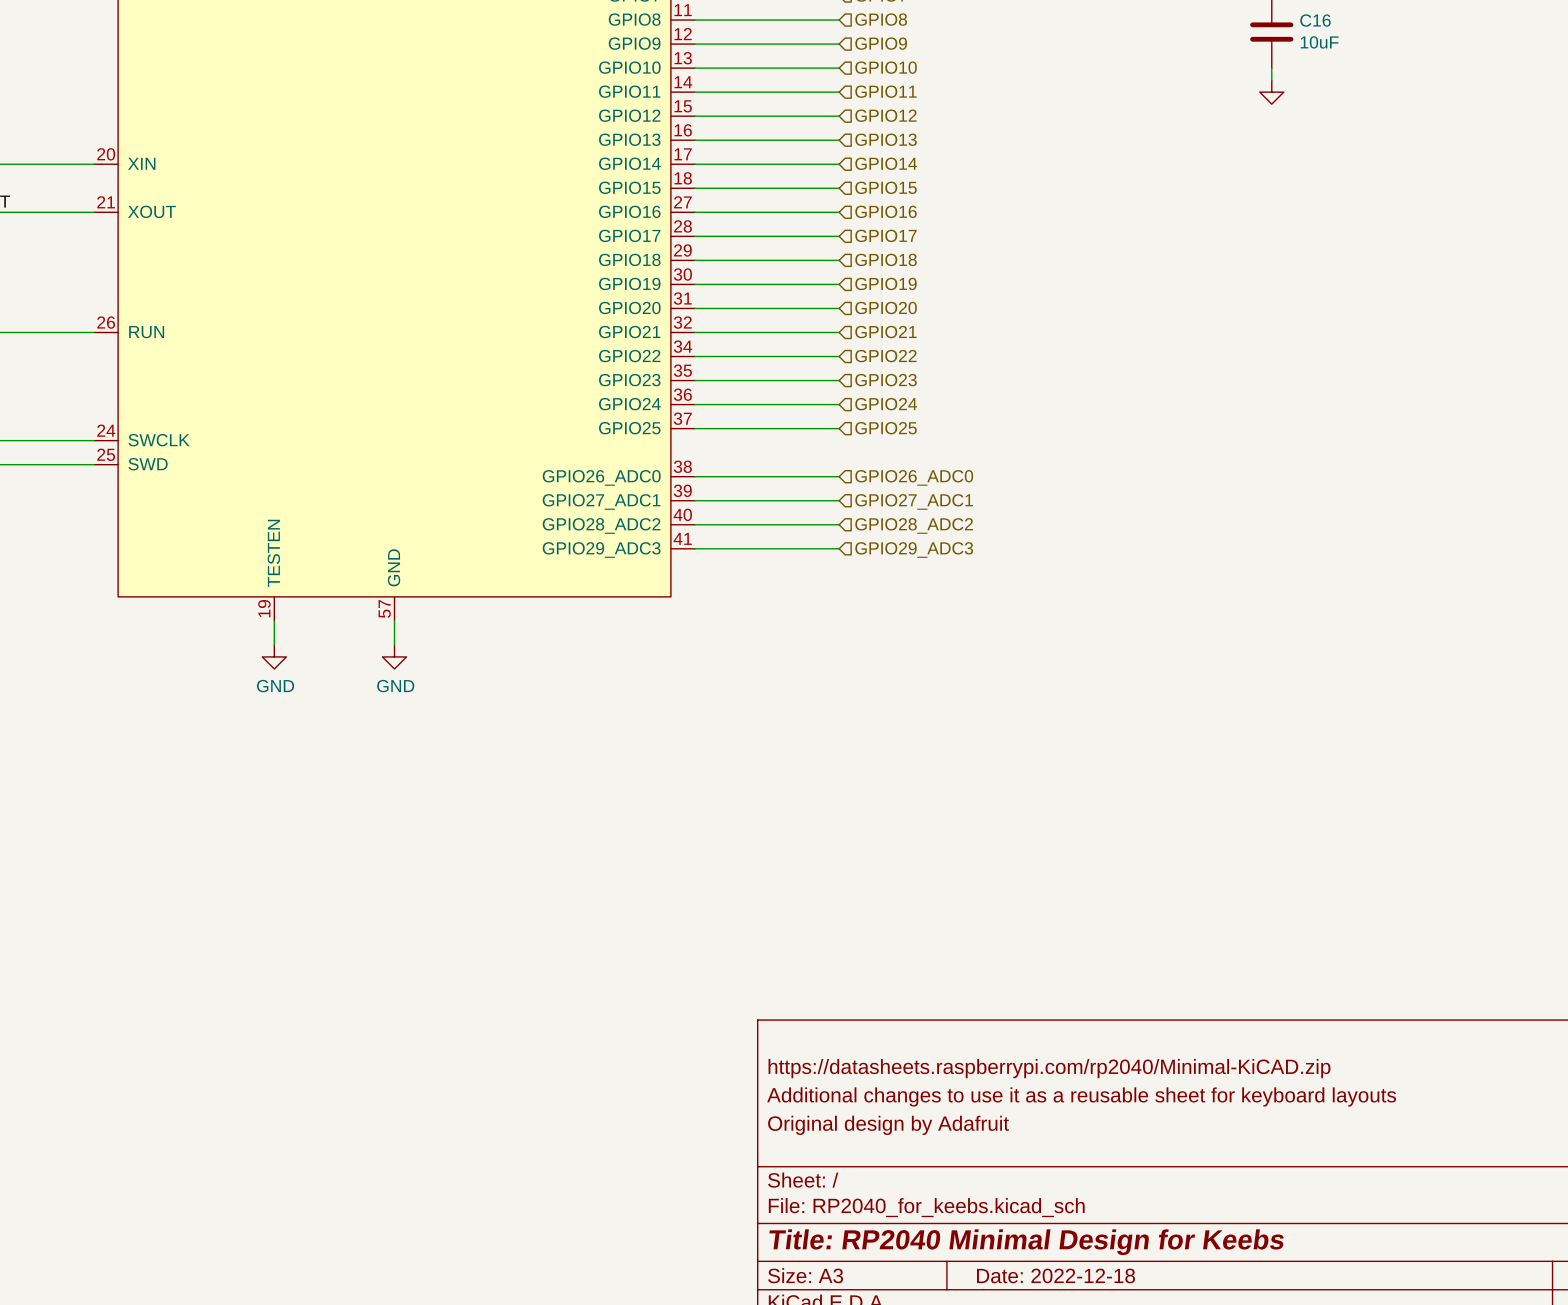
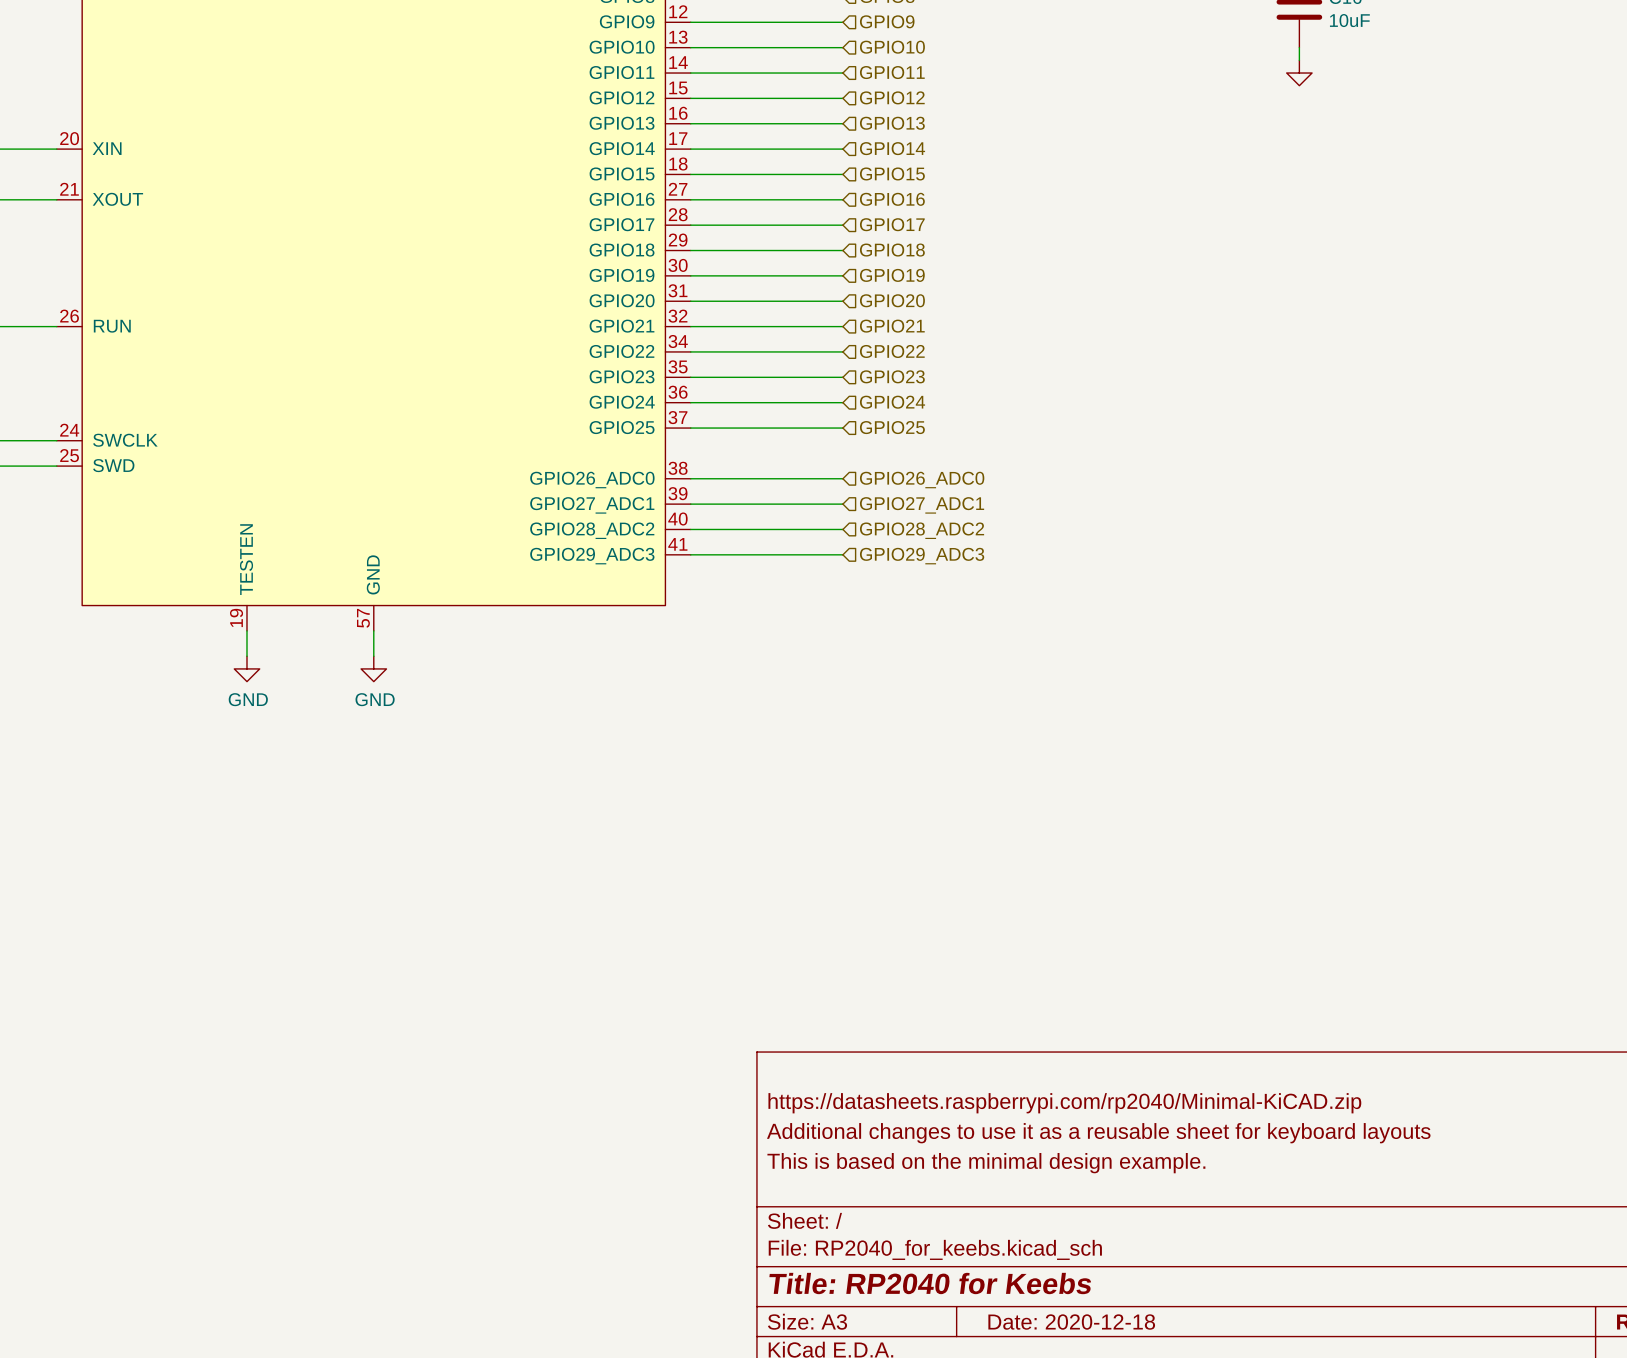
title block: Original design by Adafruit (888, 1125) -> This is based on the minimal design example. (986, 1163)
title block: Title: RP2040 Minimal Design for Keebs (1026, 1242) -> Title: RP2040 for Keebs (930, 1283)
title block: Date: 2022-12-18 (1056, 1275) -> Date: 2020-12-18 (1071, 1322)

